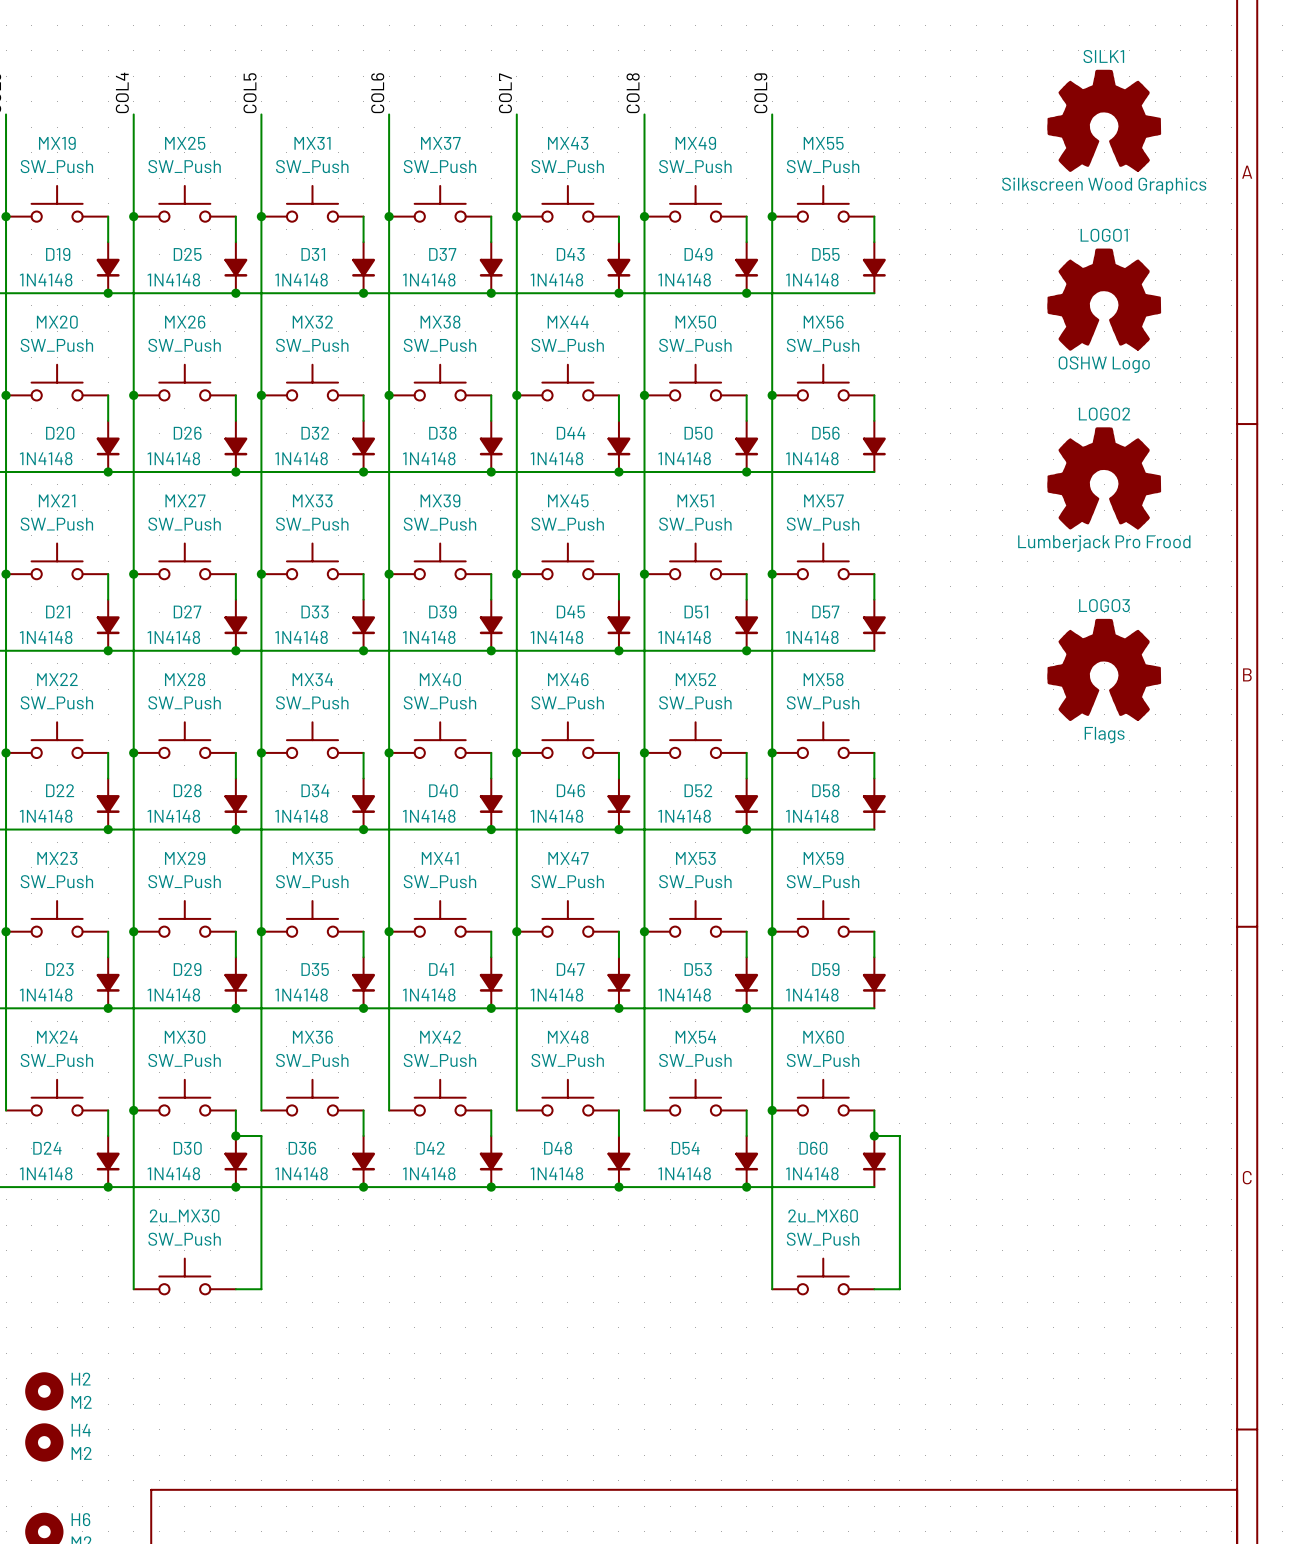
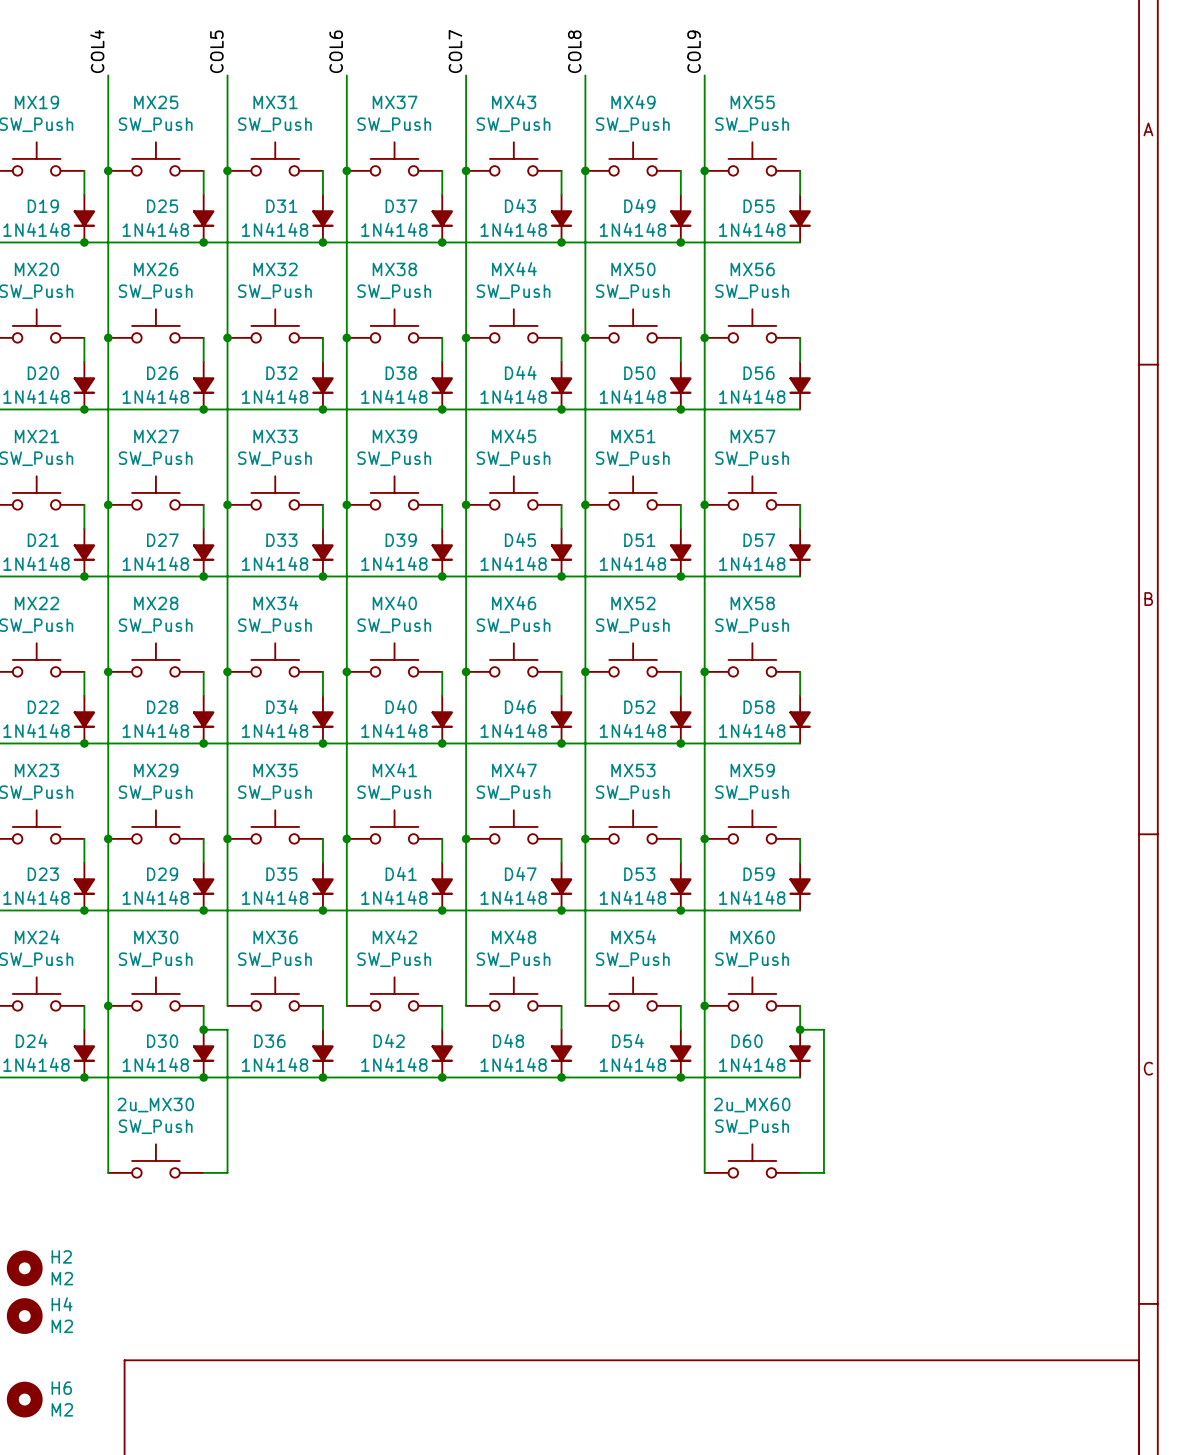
SILK1: Silkscreen Wood Graphics (1104, 120) -> none
LOGO1: OSHW Logo (1104, 299) -> none
LOGO2: Lumberjack Pro Frood (1104, 478) -> none
LOGO3: Flags (1104, 669) -> none

